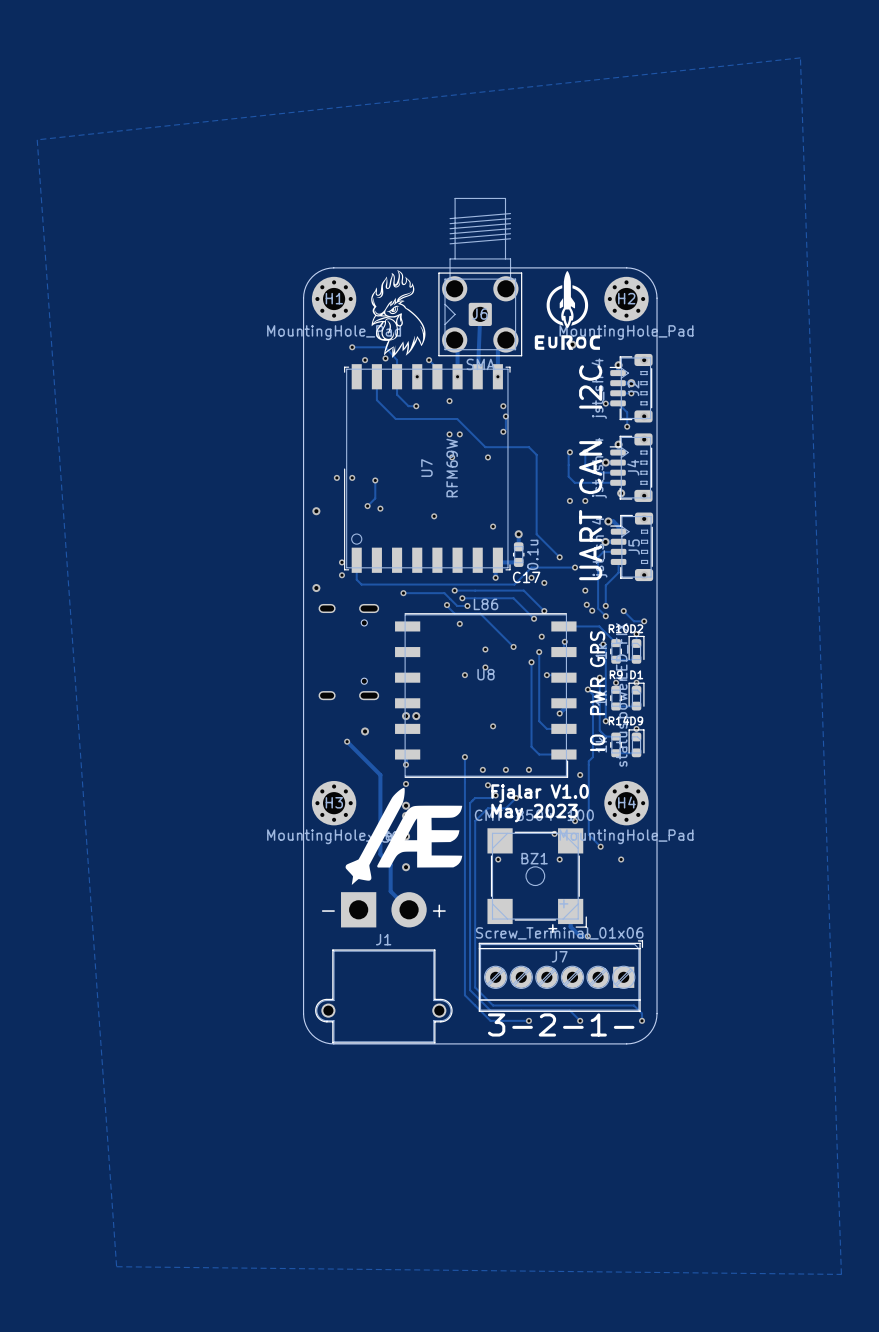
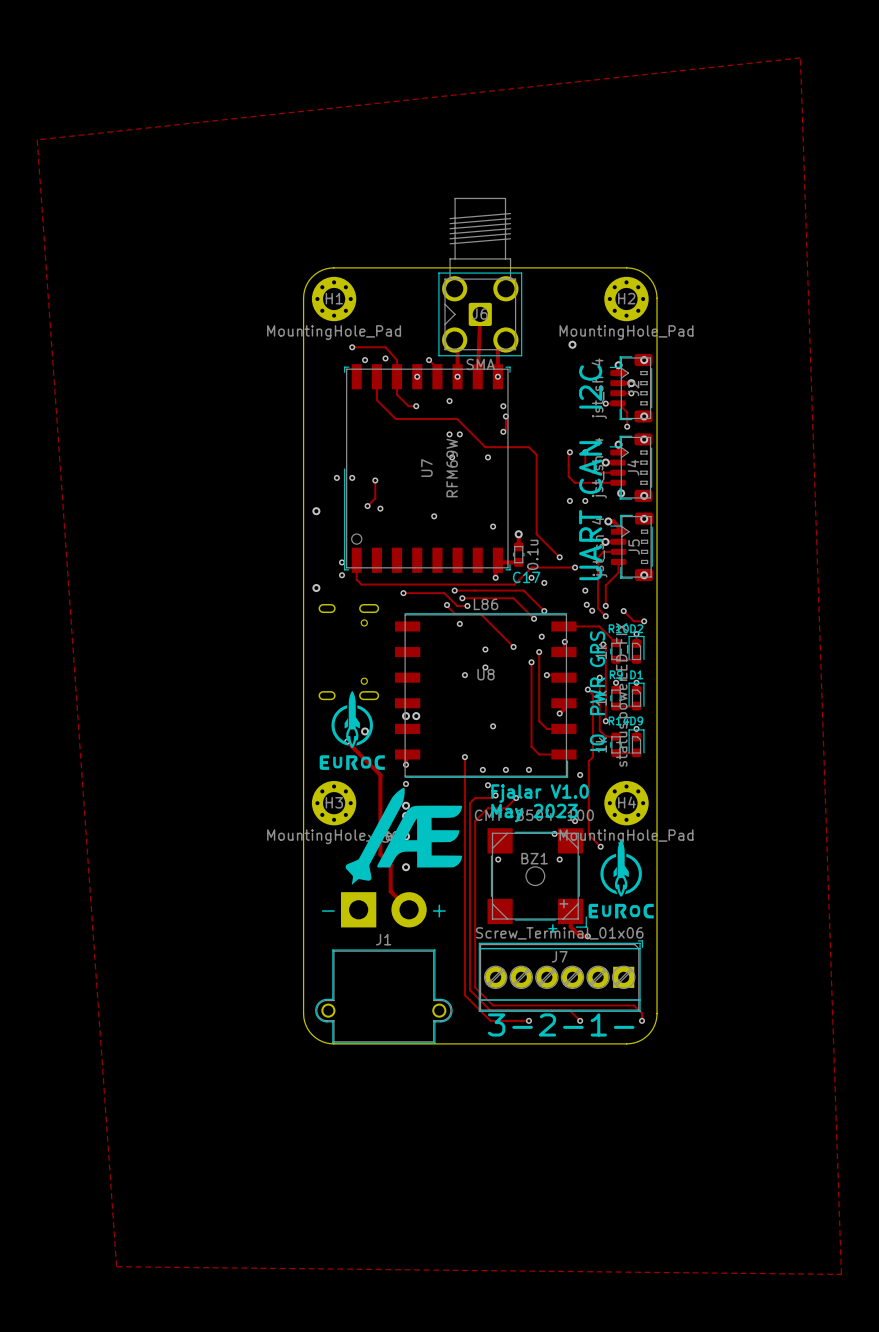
drawing: [371, 270, 426, 358] -> none
drawing: [534, 271, 600, 350] -> none
drawing: none -> [319, 691, 385, 770]
drawing: none -> [588, 839, 654, 919]

